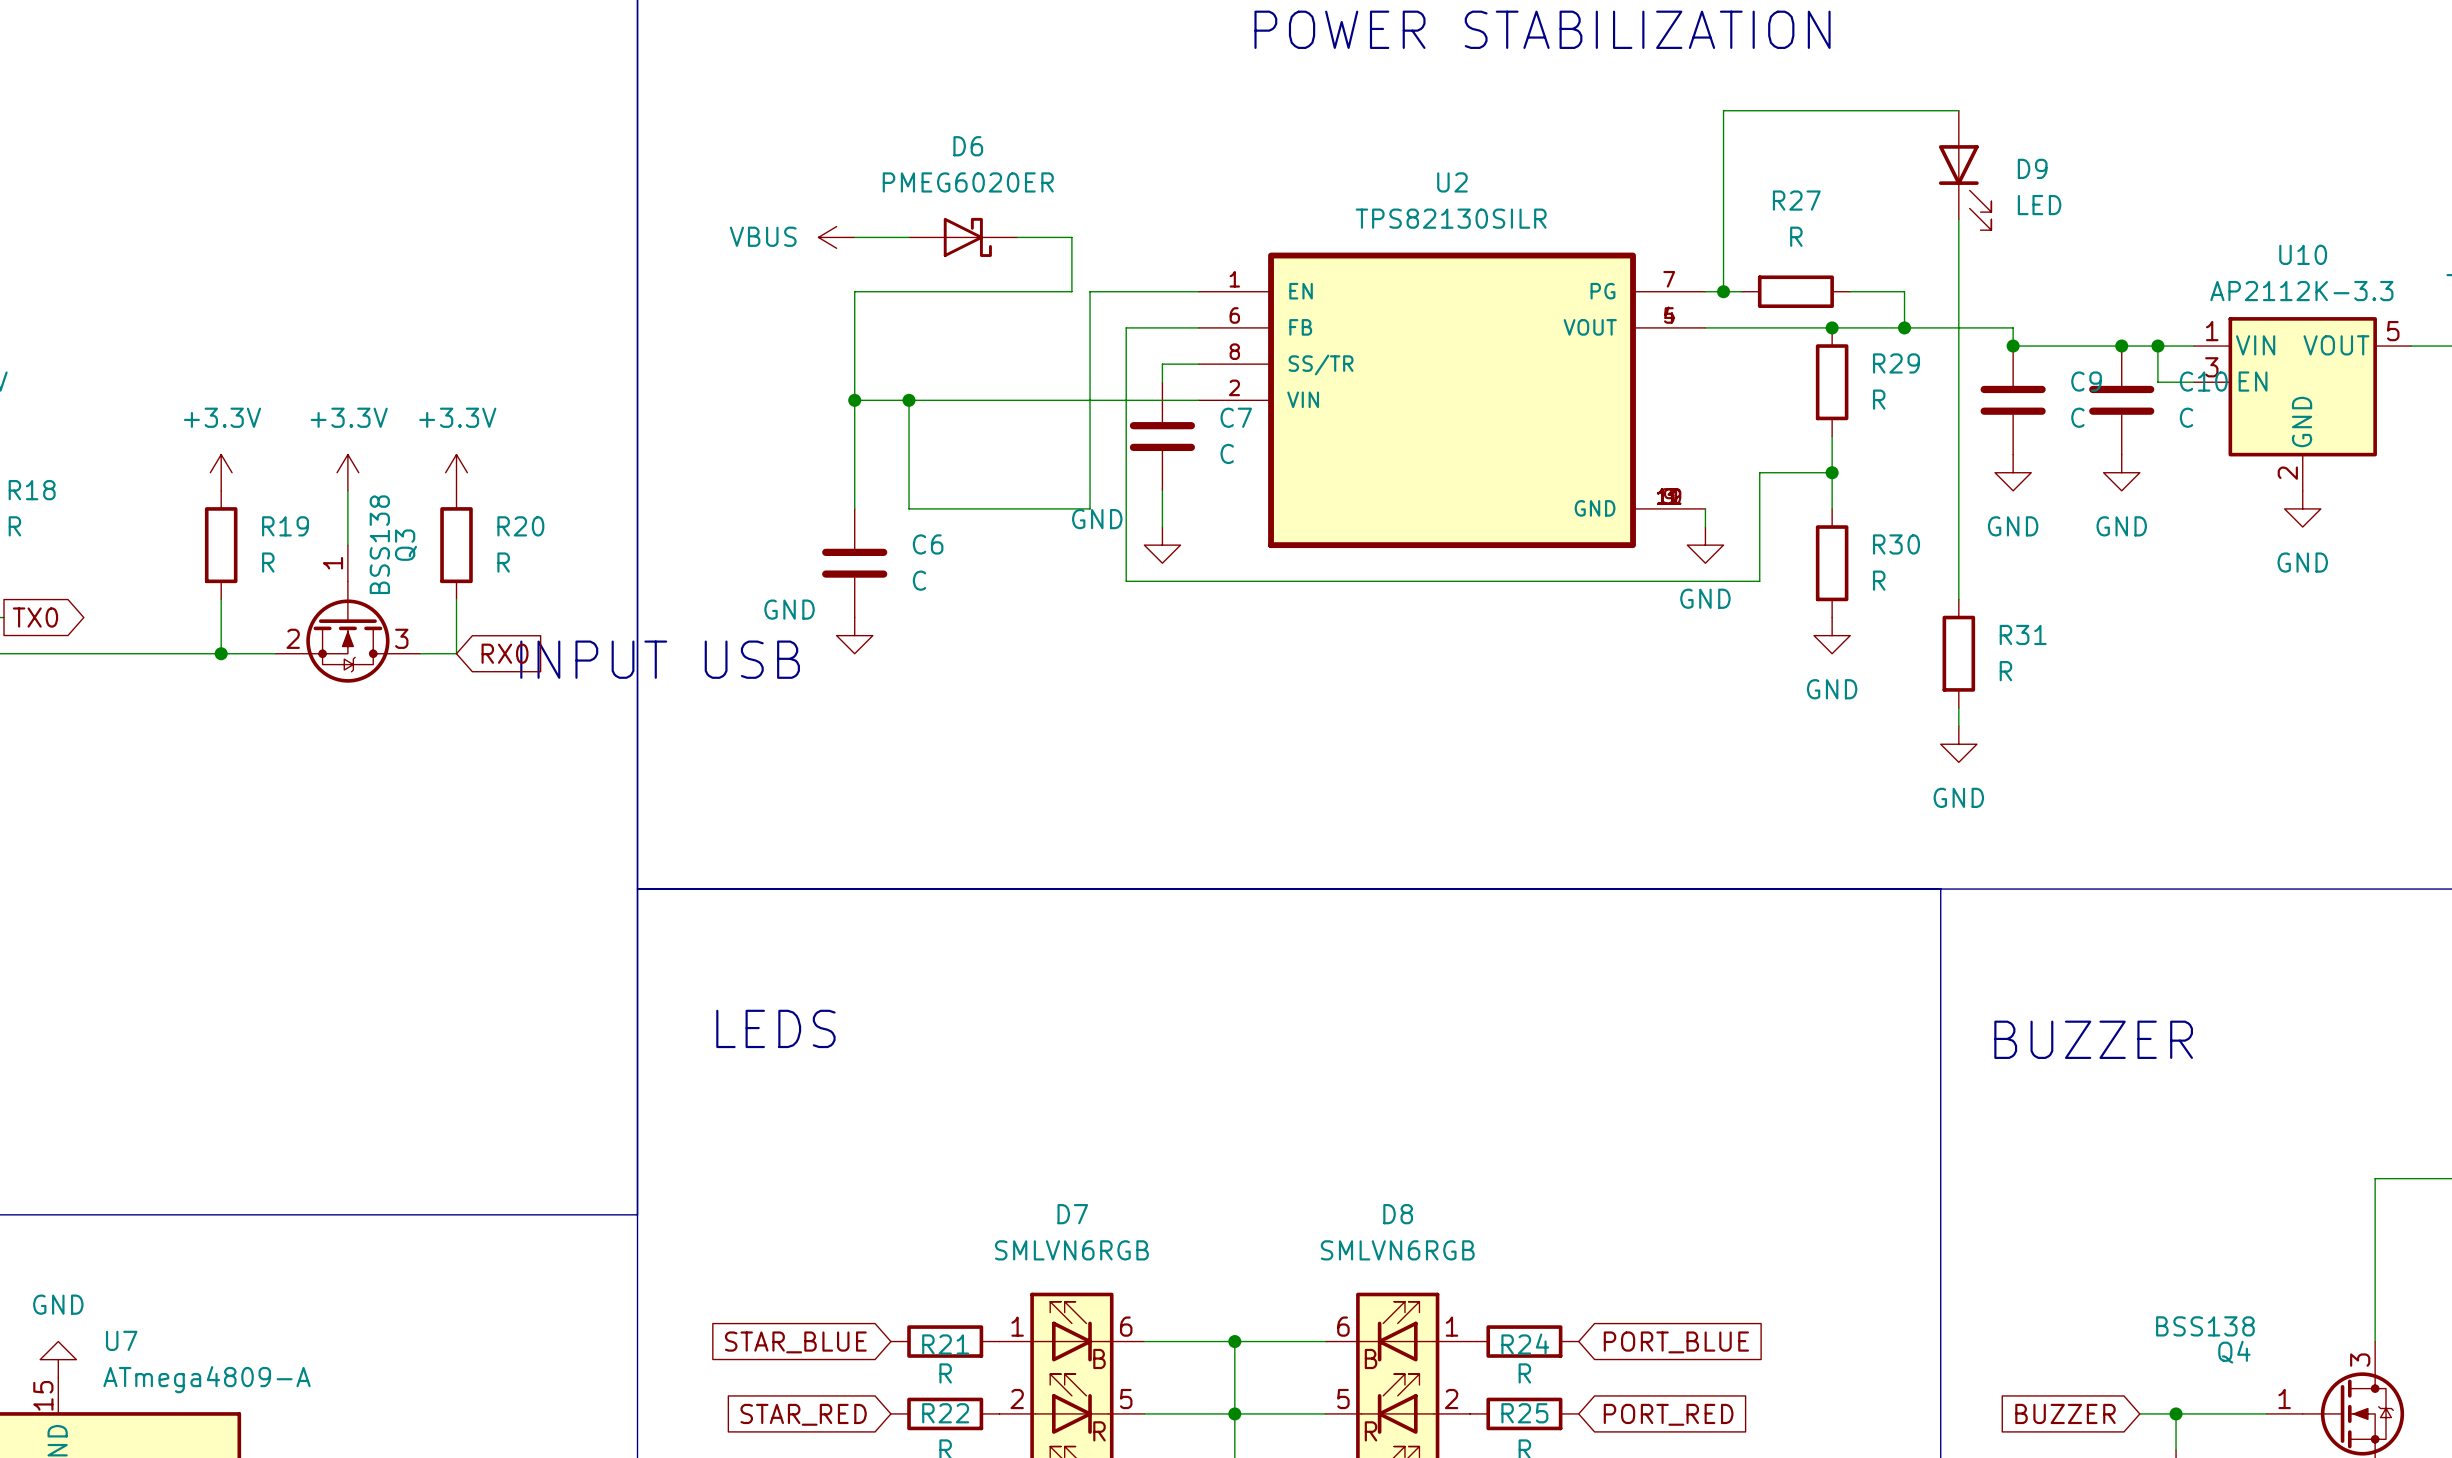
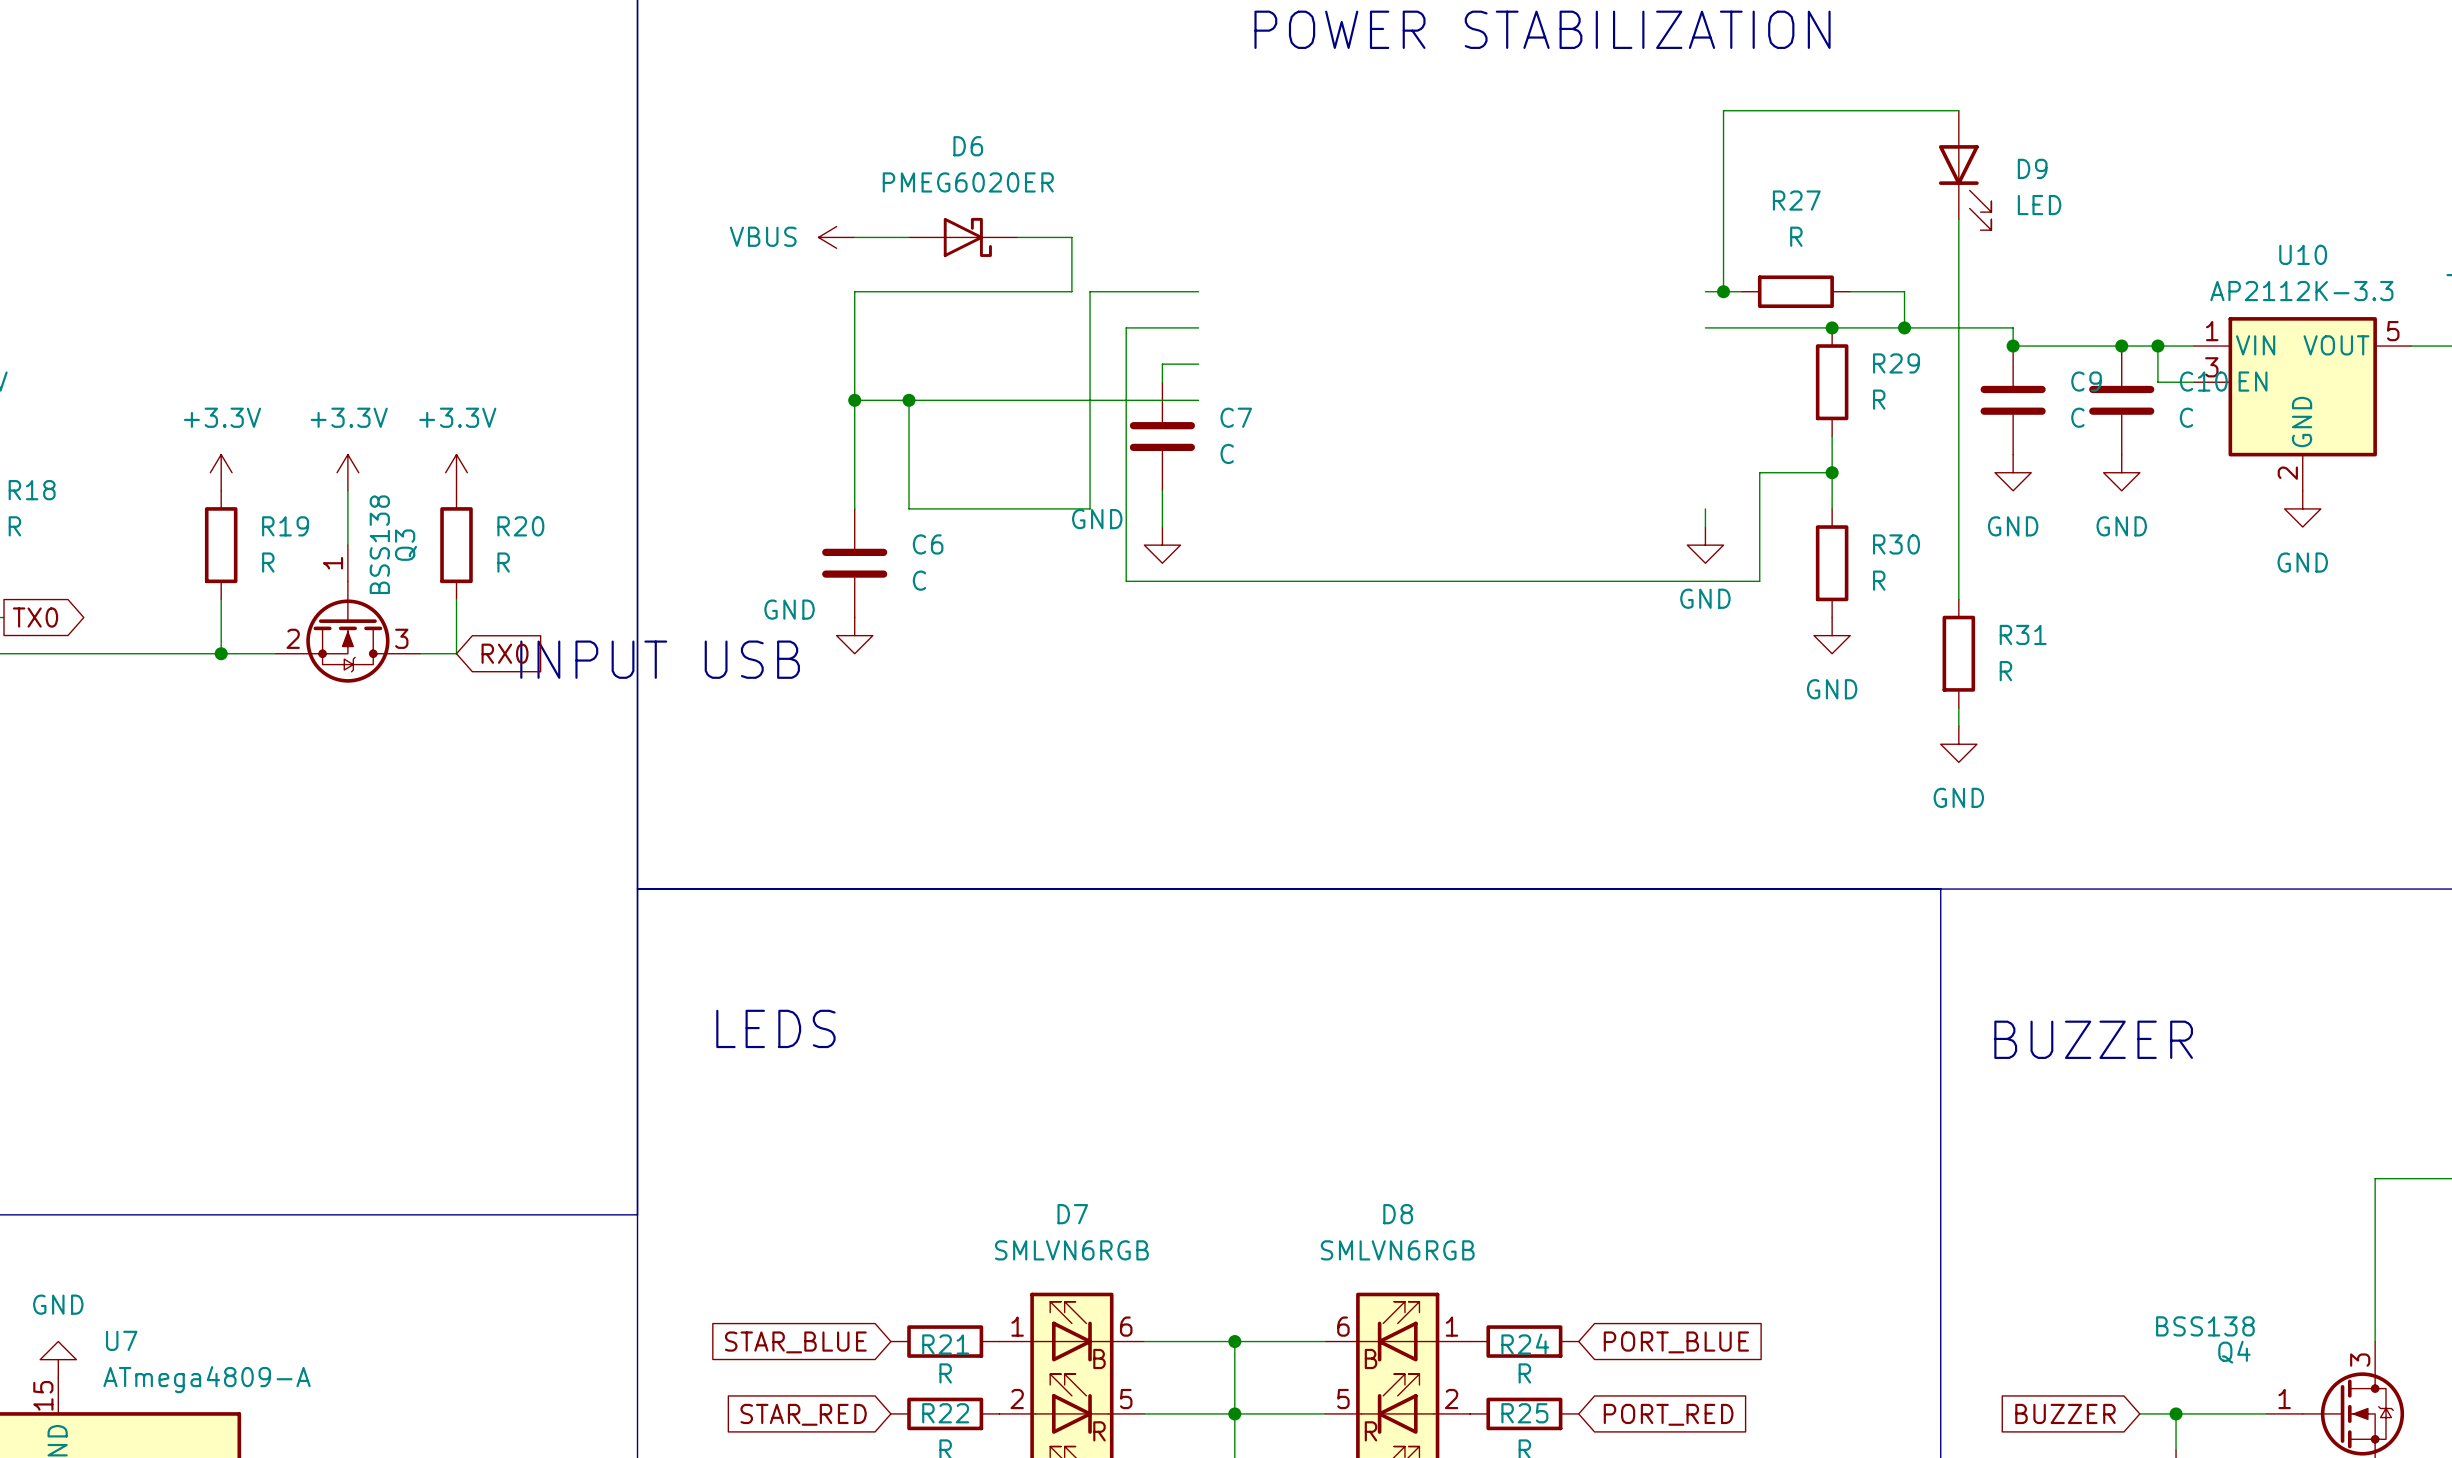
U2: TPS82130SILR (1452, 400) -> none

